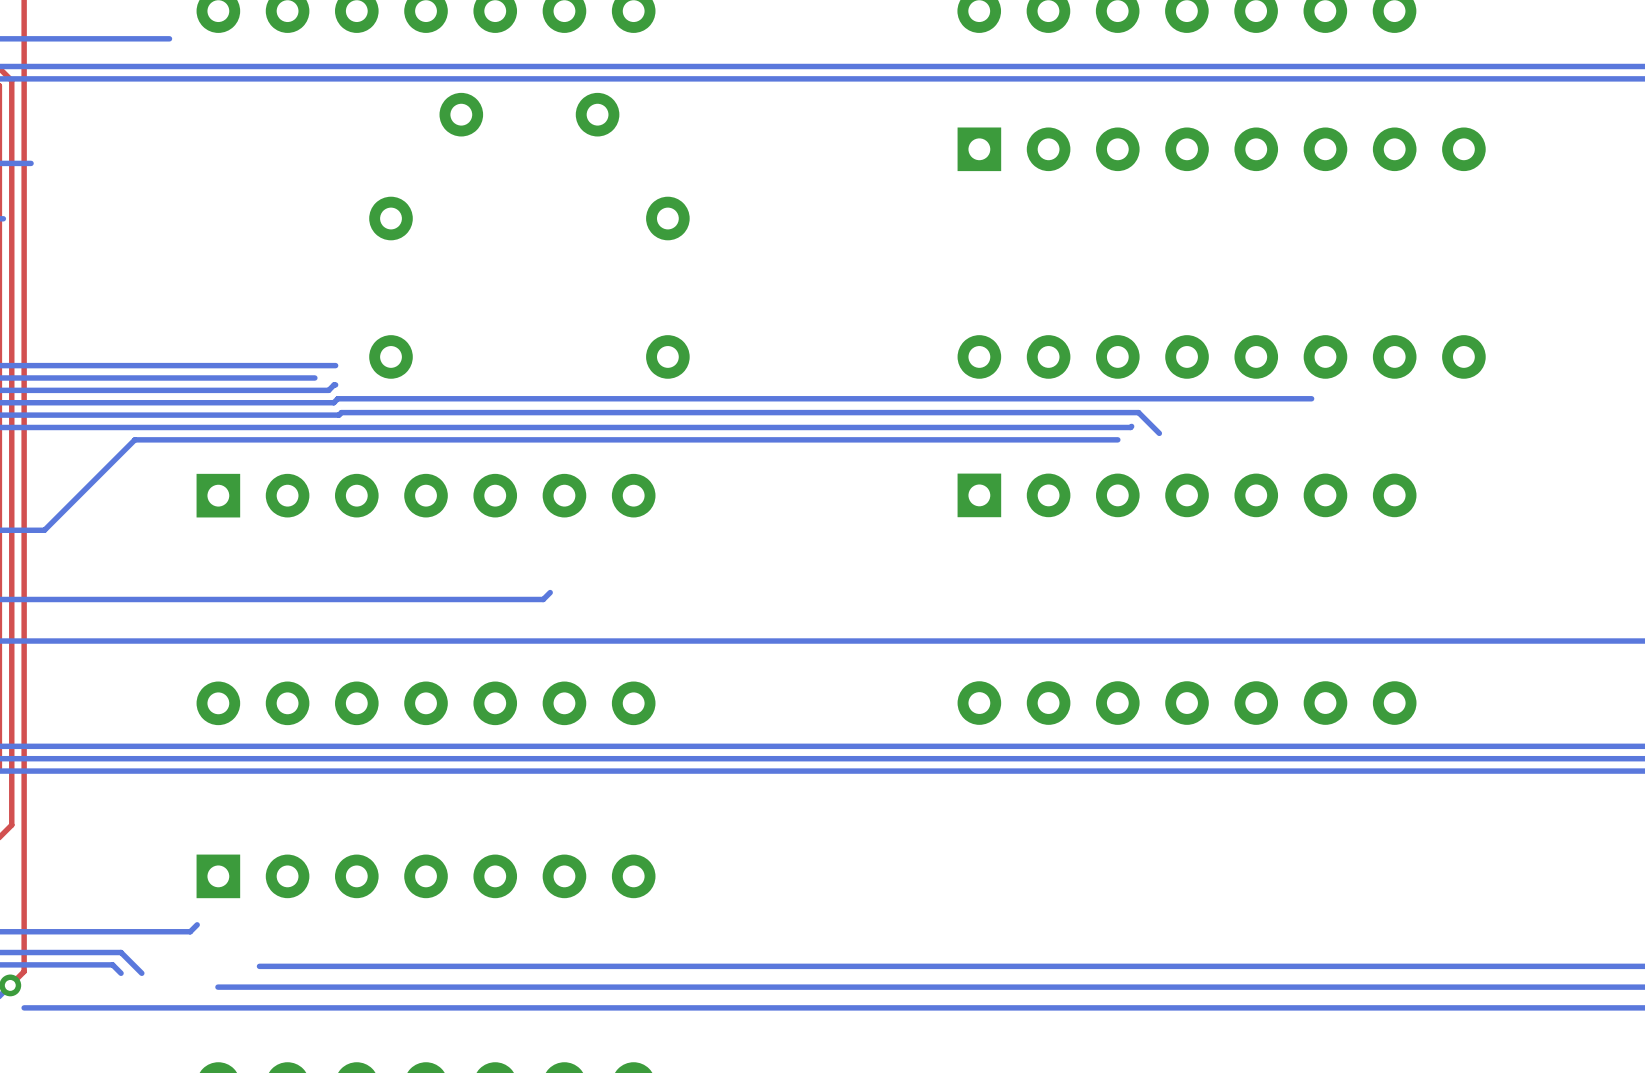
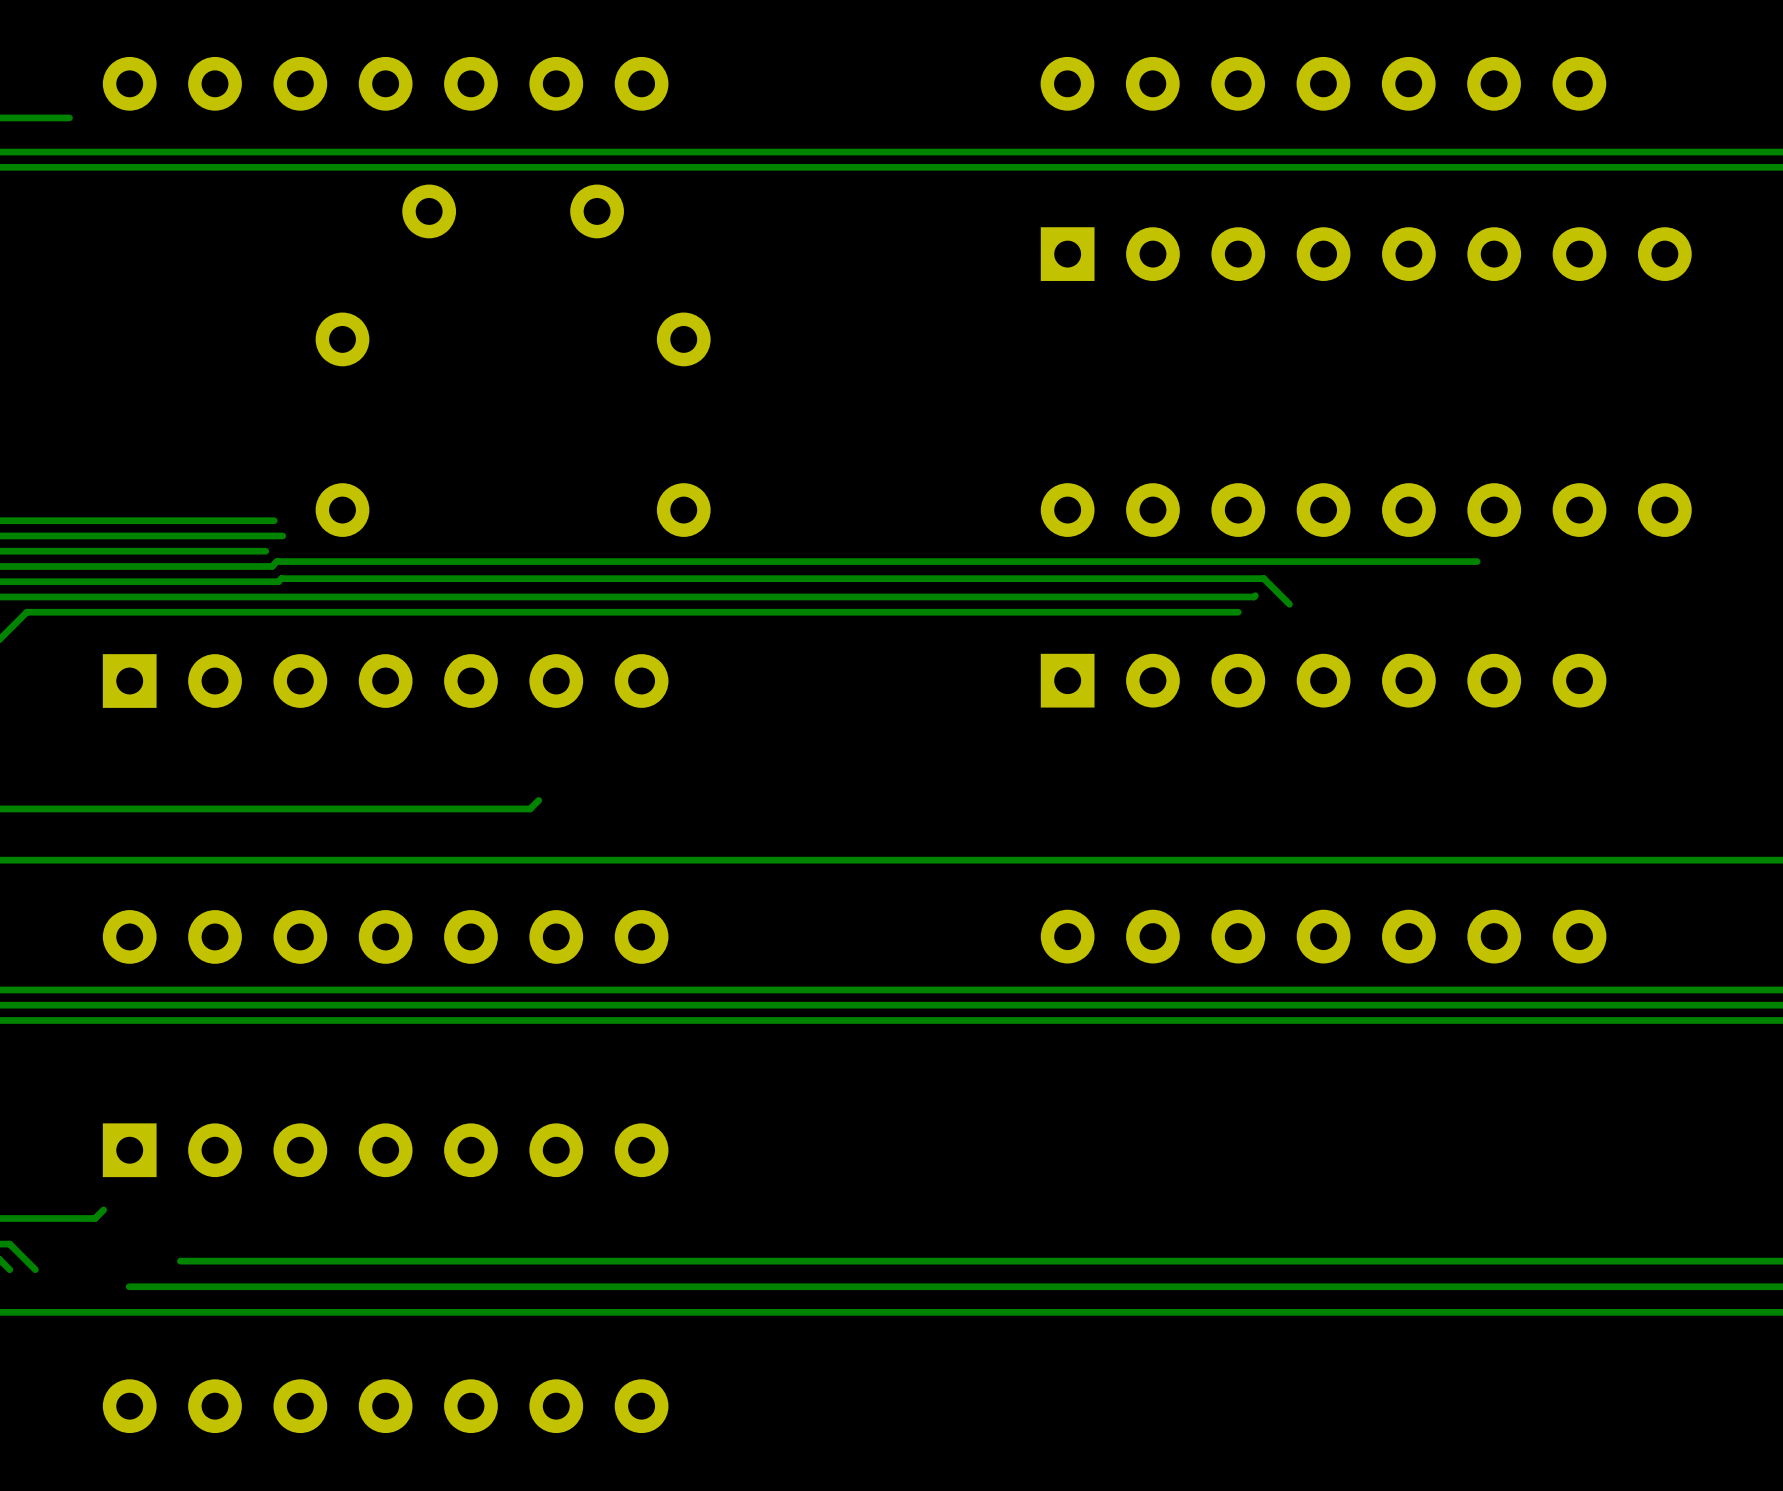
bottom track: none -> (282, 535) (248, 535)
bottom track: (335, 384) (328, 390) -> none

